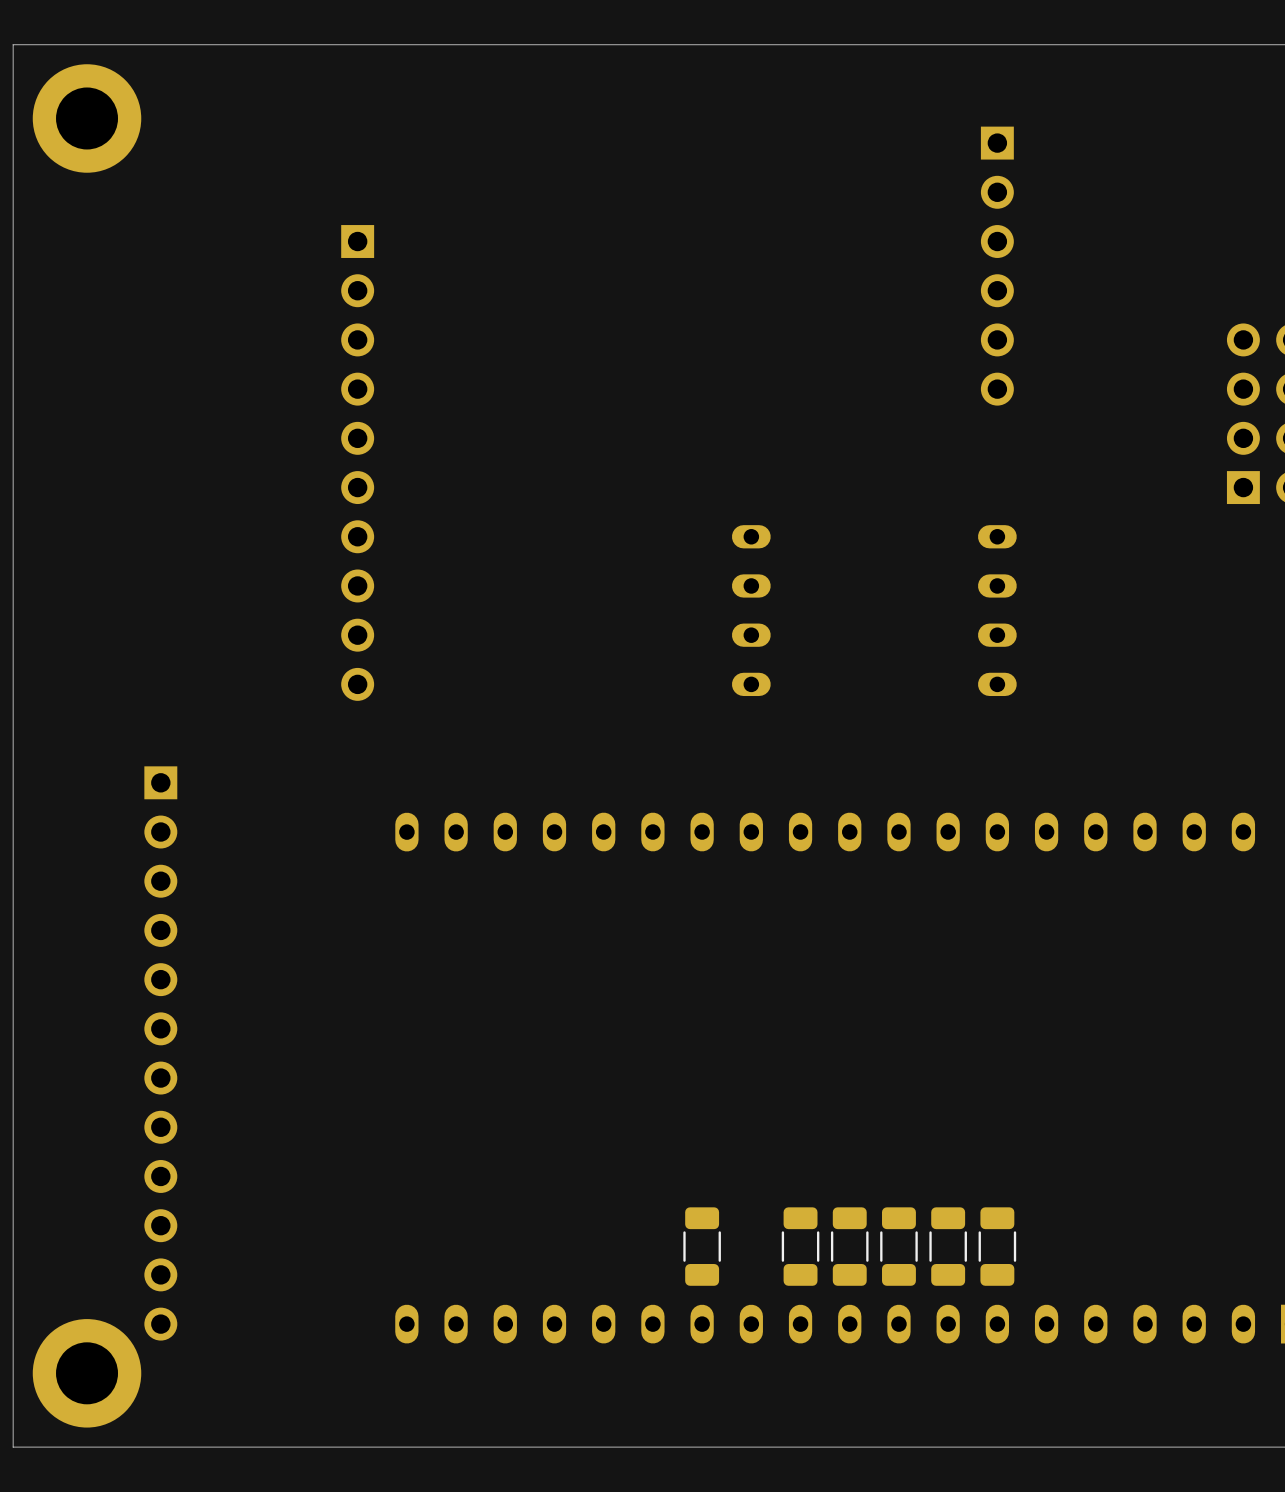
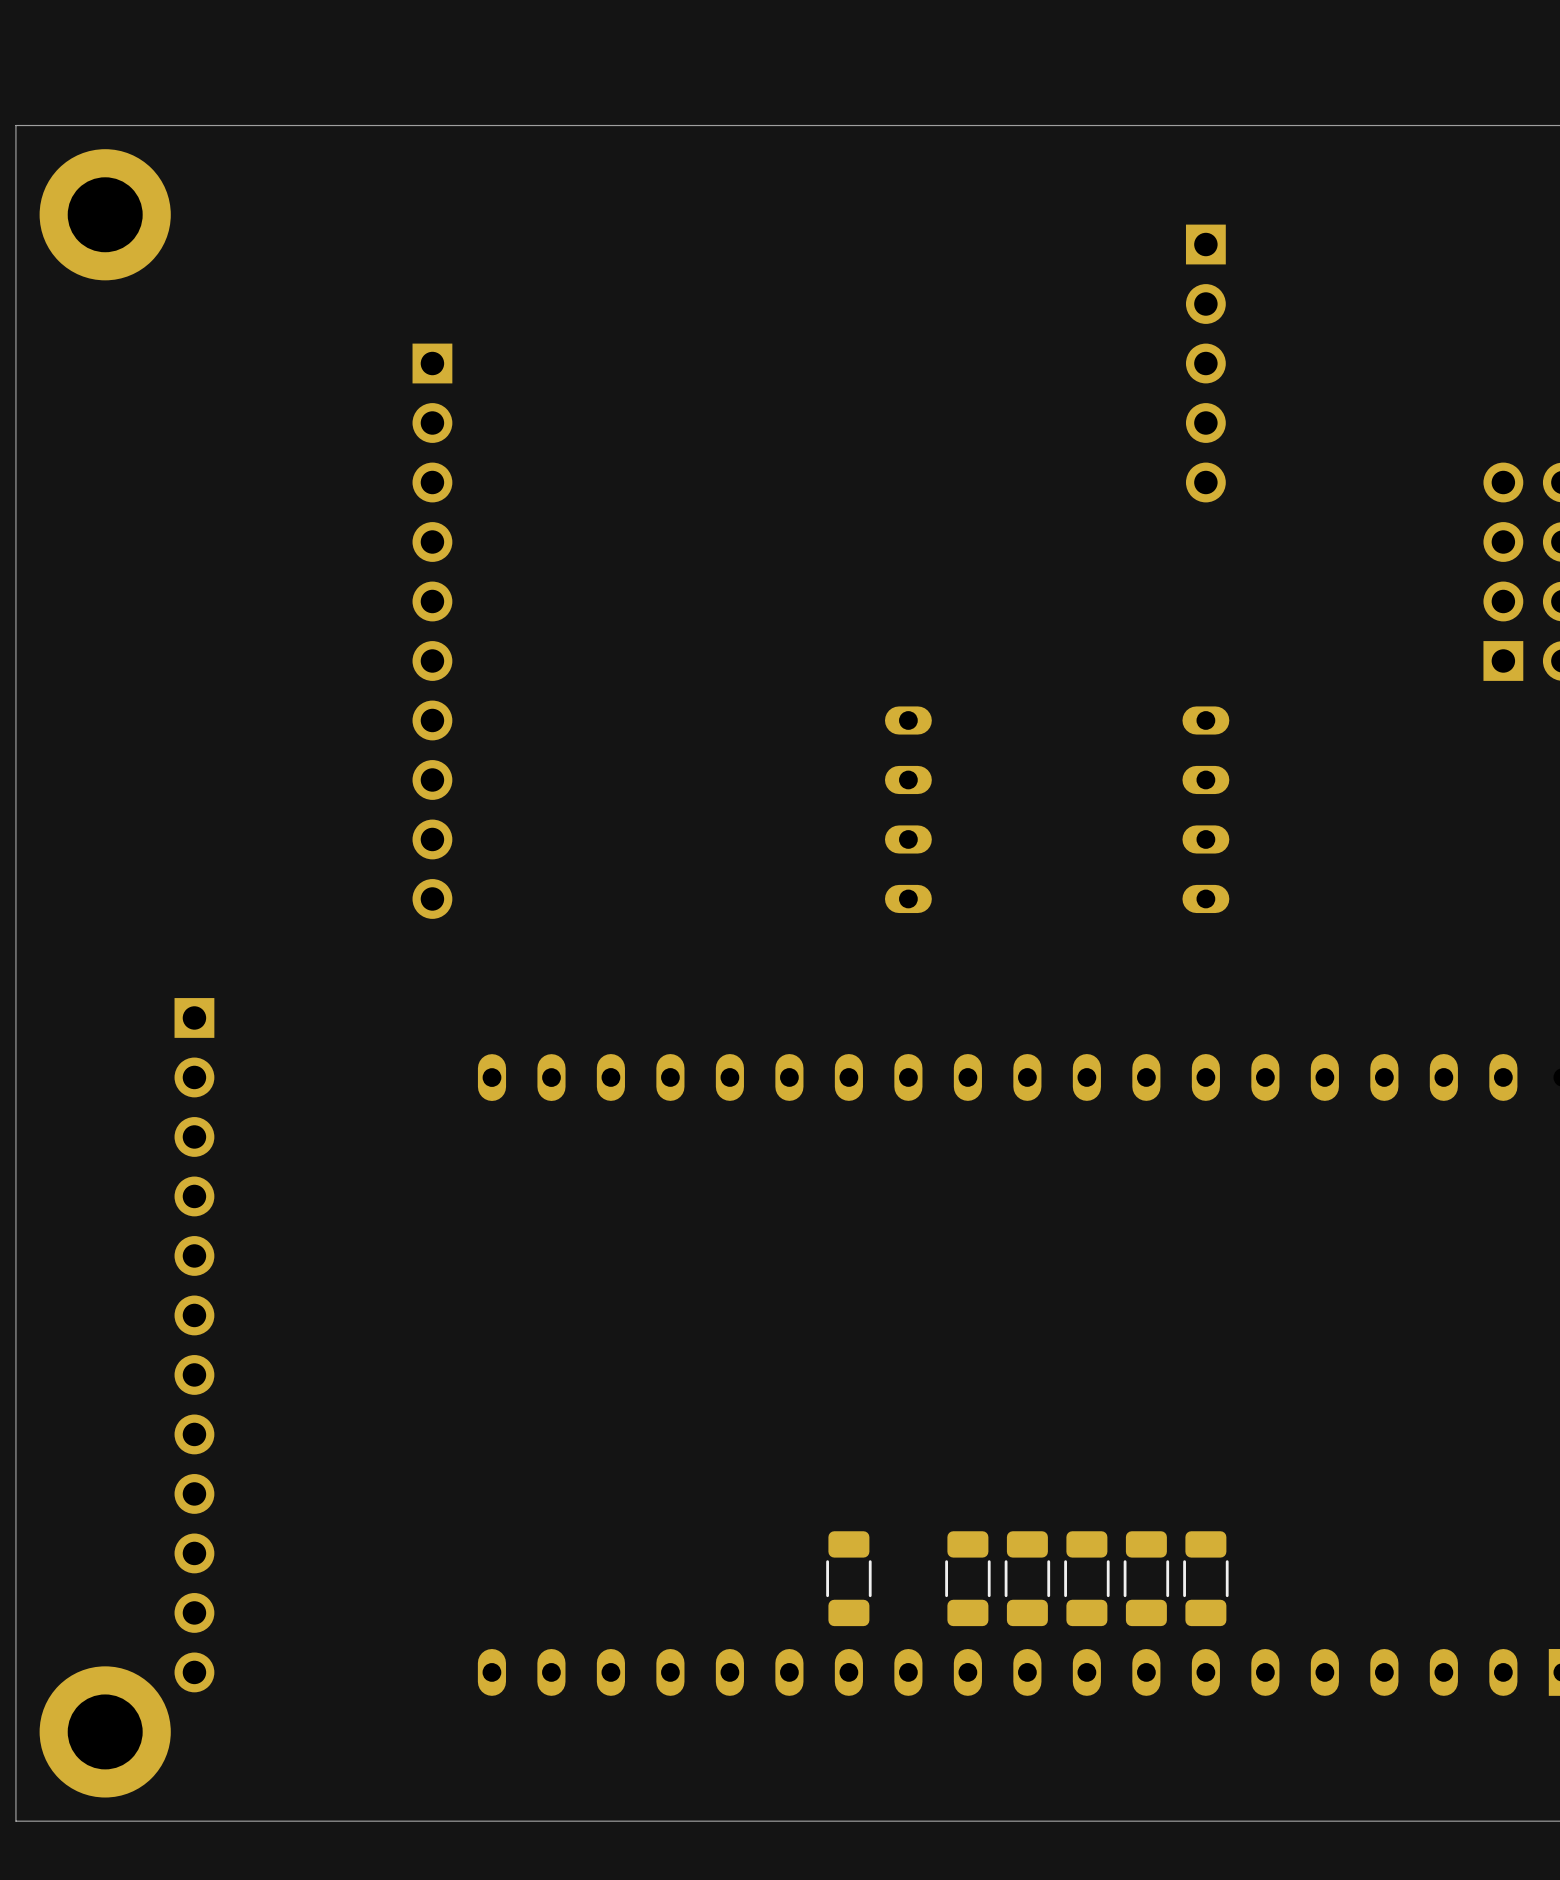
part: (997, 266) -> none

